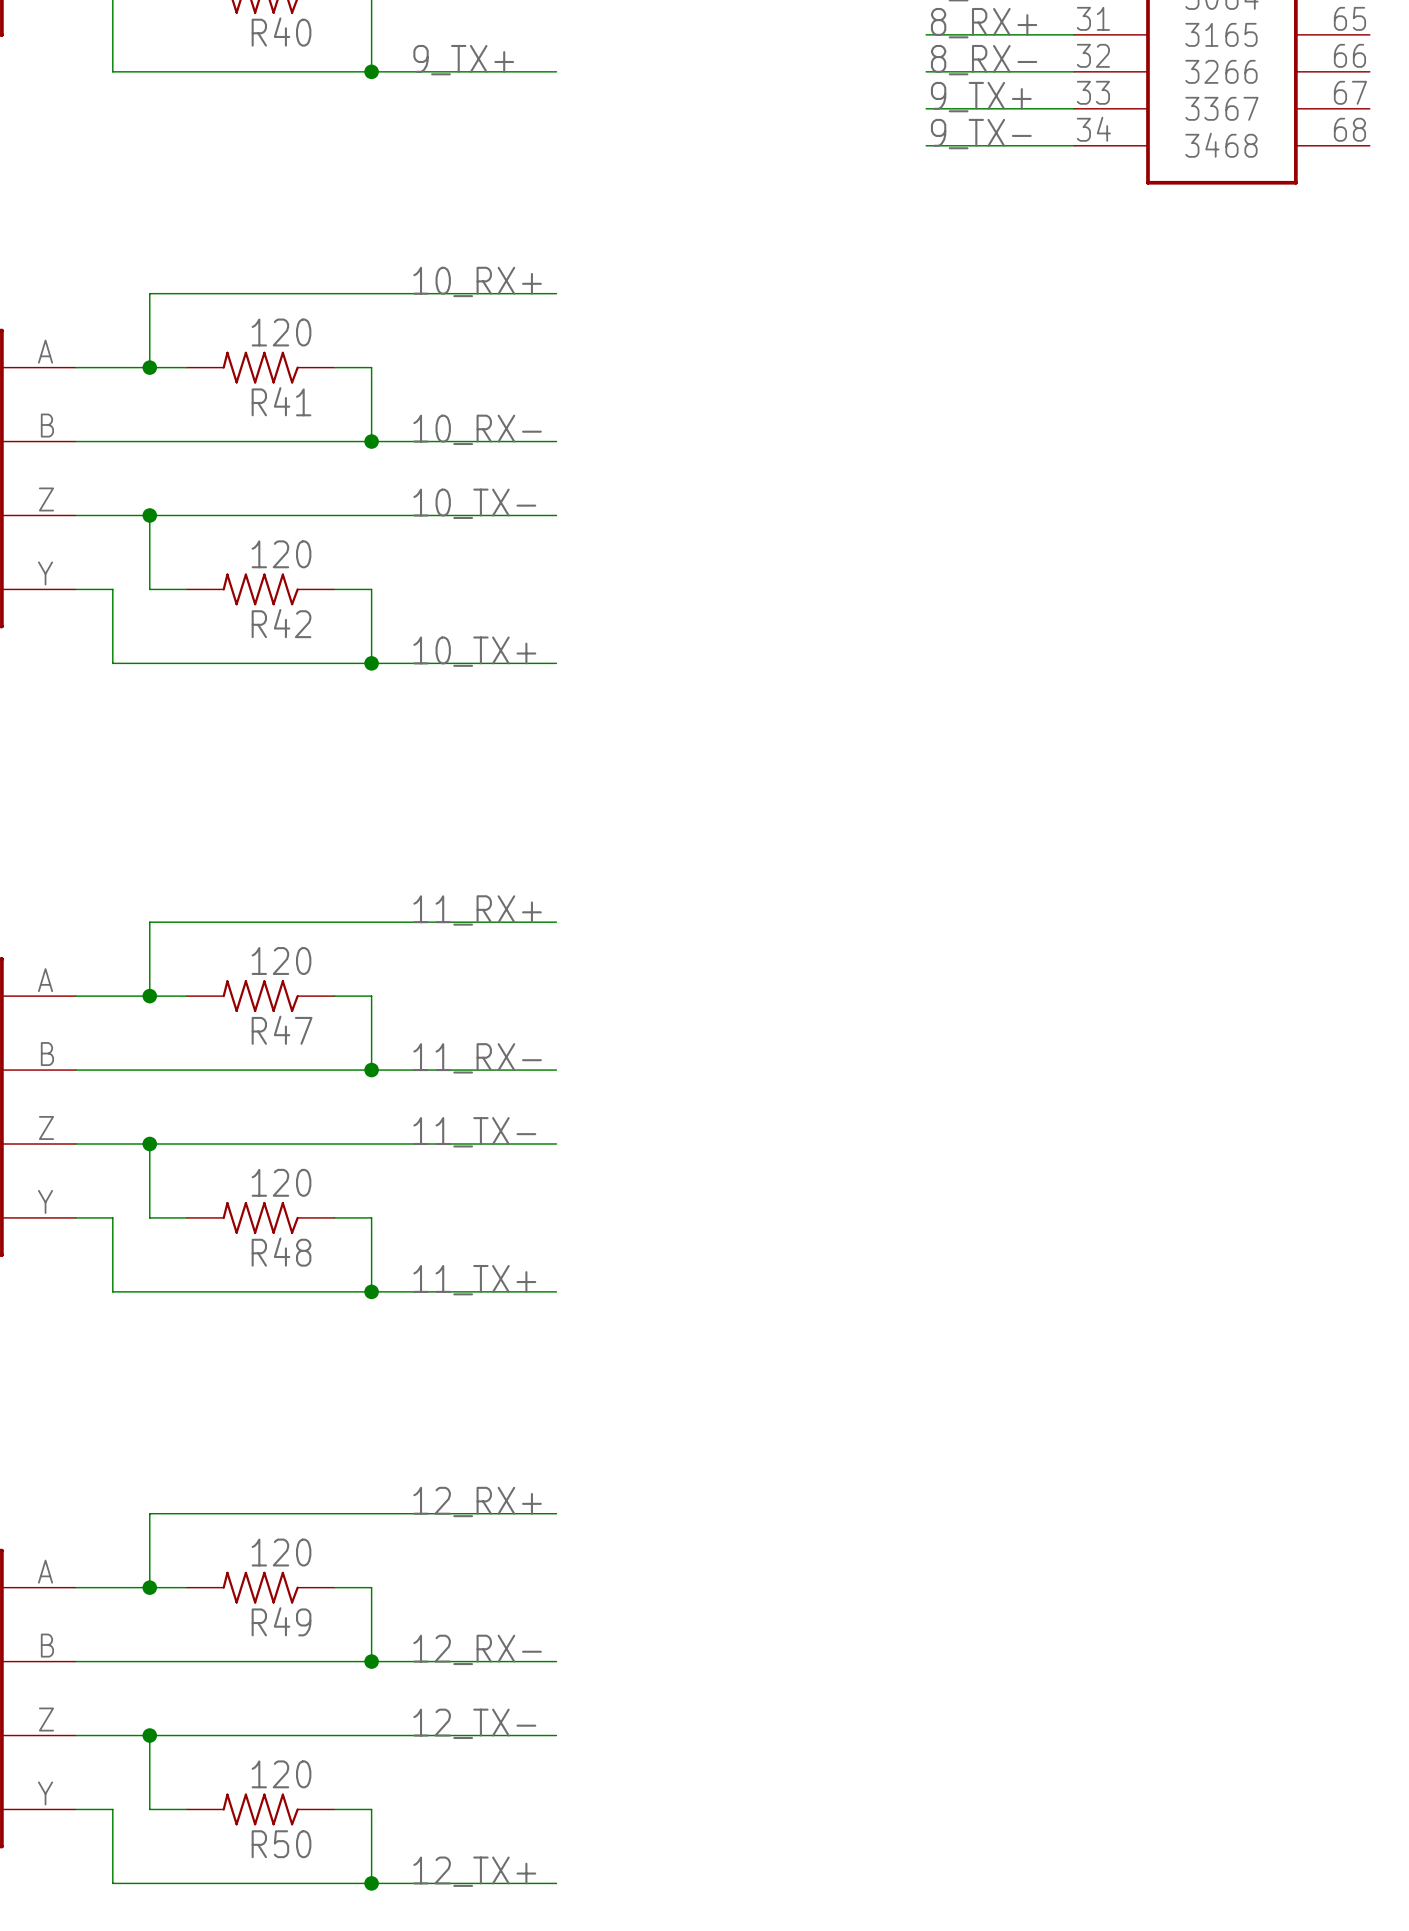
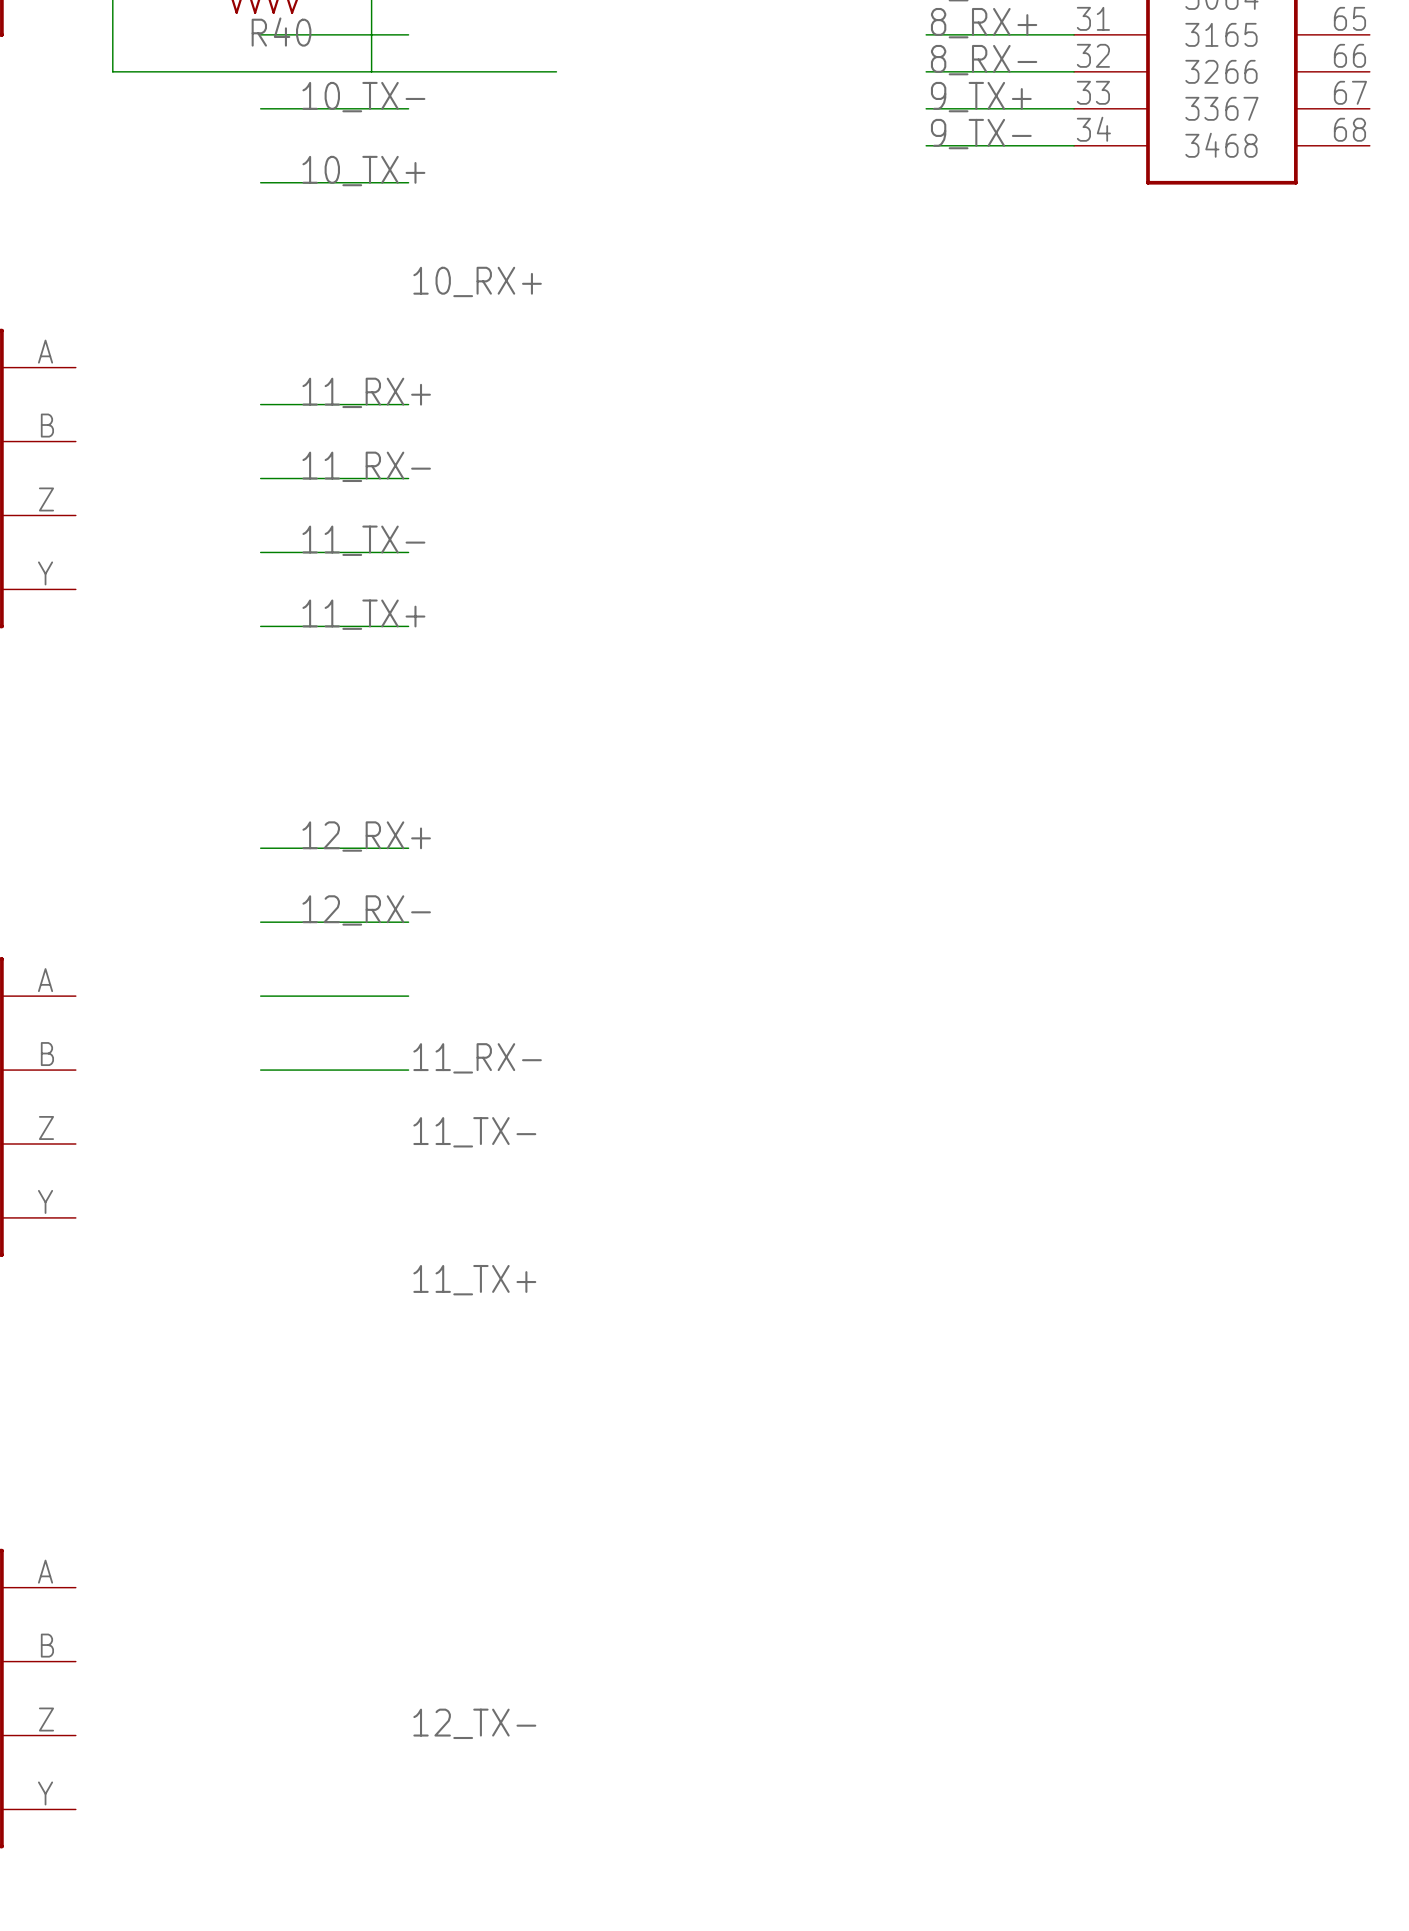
wire: none -> (260, 34) (408, 34)
label: 9_TX+ (463, 60) -> none
junction: (371, 71) -> none
label: none -> 10_TX- (363, 97)
wire: none -> (260, 108) (408, 108)
label: none -> 10_TX+ (363, 171)
wire: none -> (260, 182) (408, 182)
wire: (556, 293) (149, 293) (149, 367) -> none
wire: (75, 367) (186, 367) -> none
junction: (149, 367) -> none
R41: 120 (260, 367) -> none
wire: (334, 367) (371, 367) (371, 441) -> none
label: none -> 11_RX+ (366, 392)
wire: none -> (260, 404) (408, 404)
label: 10_RX- (477, 429) -> none
wire: (75, 441) (556, 441) -> none
junction: (371, 441) -> none
label: none -> 11_RX- (366, 466)
wire: none -> (260, 478) (408, 478)
label: 10_TX- (474, 503) -> none
wire: (75, 515) (556, 515) -> none
wire: (149, 515) (149, 589) (186, 589) -> none
junction: (149, 515) -> none
label: none -> 11_TX- (363, 540)
wire: none -> (260, 552) (408, 552)
wire: (75, 589) (112, 589) (112, 663) (556, 663) -> none
R42: 120 (260, 589) -> none
wire: (334, 589) (371, 589) (371, 663) -> none
wire: none -> (260, 626) (408, 626)
label: 10_TX+ (474, 651) -> 11_TX+ (363, 614)
junction: (371, 663) -> none
label: none -> 12_RX+ (366, 836)
label: 11_RX+ (477, 910) -> 12_RX- (366, 910)
wire: (260, 922) (149, 922) (149, 996) -> none
wire: (408, 922) (556, 922) -> (260, 848) (408, 848)
wire: (75, 996) (186, 996) -> none
junction: (149, 996) -> none
R47: 120 (260, 996) -> none
wire: (371, 996) (371, 1070) -> (371, 996) (408, 996)
wire: (75, 1070) (260, 1070) -> none
junction: (371, 1070) -> none
wire: (408, 1070) (556, 1070) -> none
wire: (75, 1143) (556, 1143) -> none
wire: (149, 1143) (149, 1217) (186, 1217) -> none
junction: (149, 1143) -> none
wire: (75, 1217) (112, 1217) (112, 1291) (556, 1291) -> none
R48: 120 (260, 1217) -> none
wire: (334, 1217) (371, 1217) (371, 1291) -> none
junction: (371, 1291) -> none
label: 12_RX+ (477, 1502) -> none
wire: (556, 1513) (149, 1513) (149, 1587) -> none
wire: (75, 1587) (186, 1587) -> none
junction: (149, 1587) -> none
R49: 120 (260, 1587) -> none
wire: (334, 1587) (371, 1587) (371, 1661) -> none
label: 12_RX- (477, 1649) -> none
wire: (75, 1661) (556, 1661) -> none
junction: (371, 1661) -> none
wire: (75, 1735) (556, 1735) -> none
wire: (149, 1735) (149, 1809) (186, 1809) -> none
junction: (149, 1735) -> none
wire: (75, 1809) (112, 1809) (112, 1883) (556, 1883) -> none
R50: 120 (260, 1809) -> none
wire: (334, 1809) (371, 1809) (371, 1883) -> none
label: 12_TX+ (474, 1871) -> none
junction: (371, 1883) -> none

